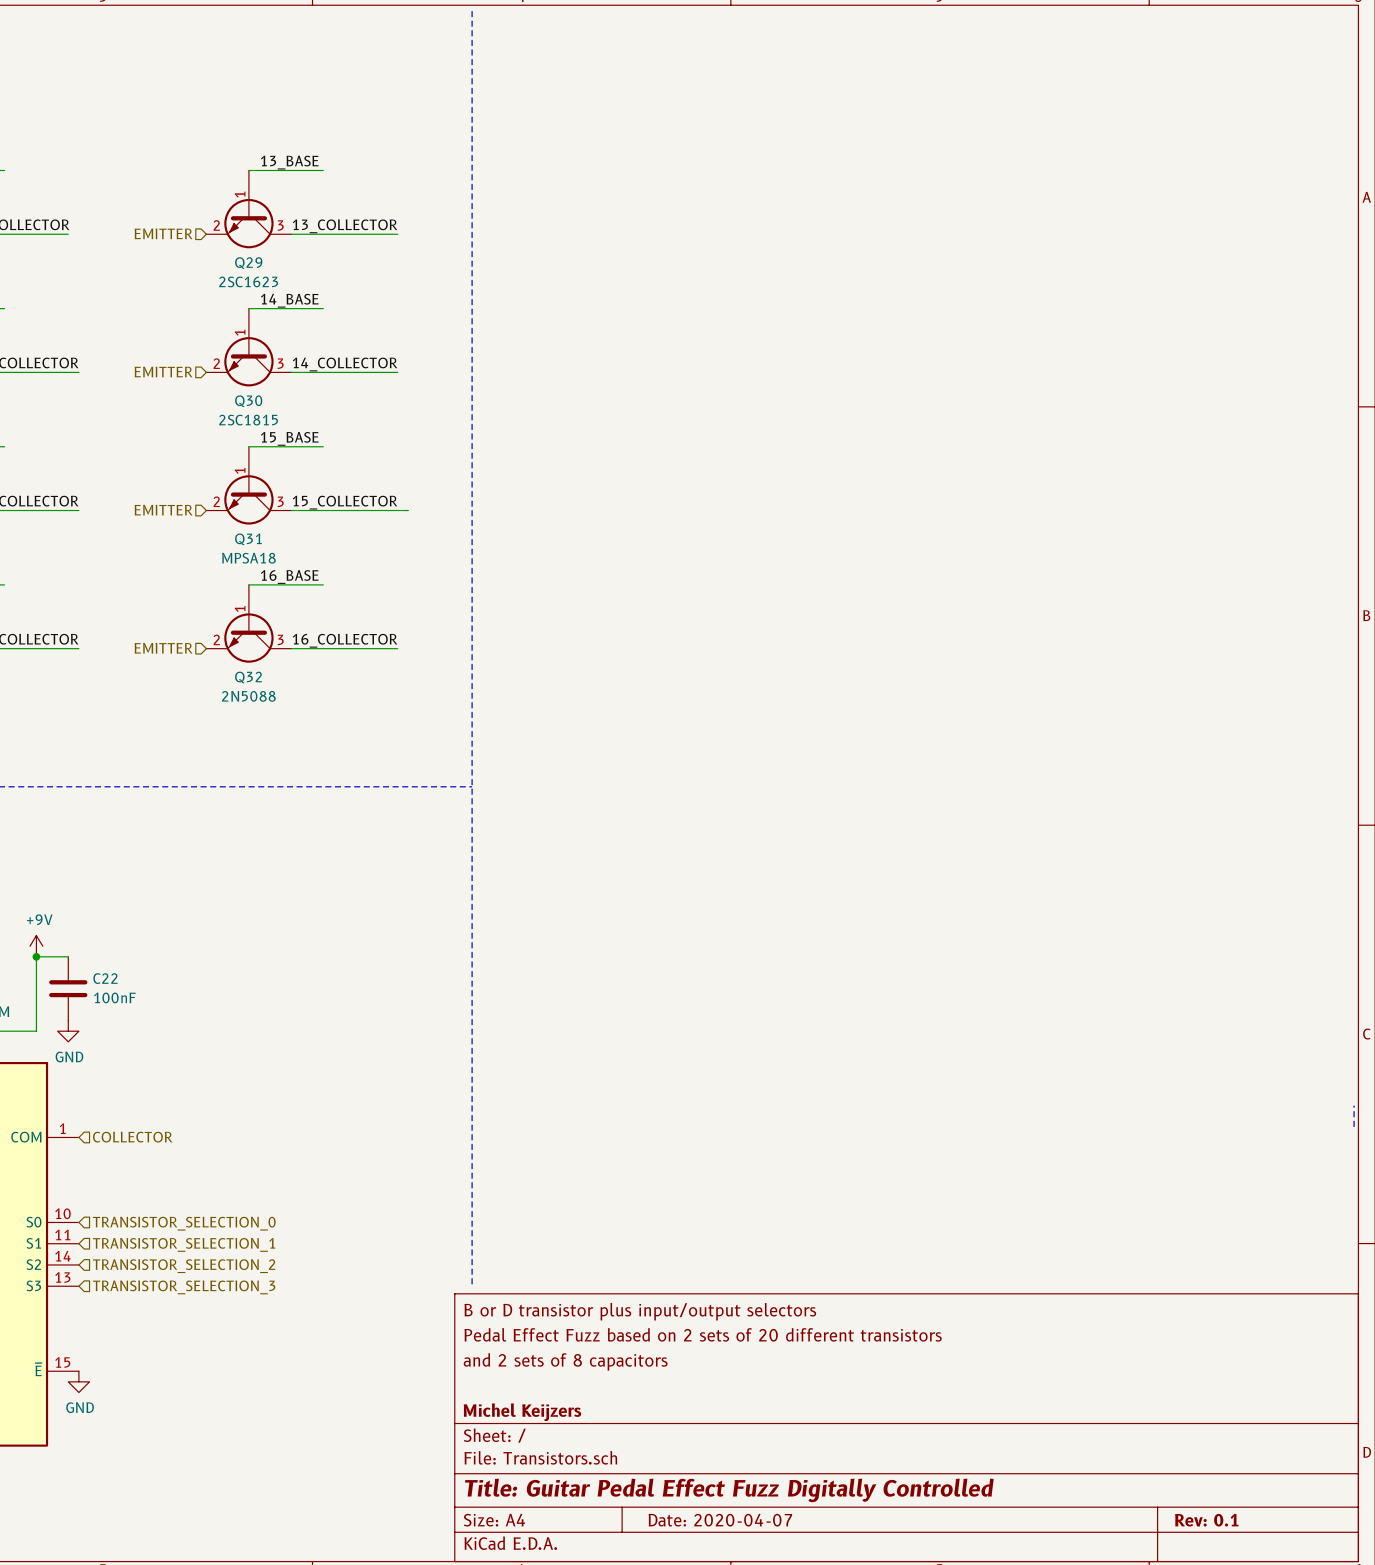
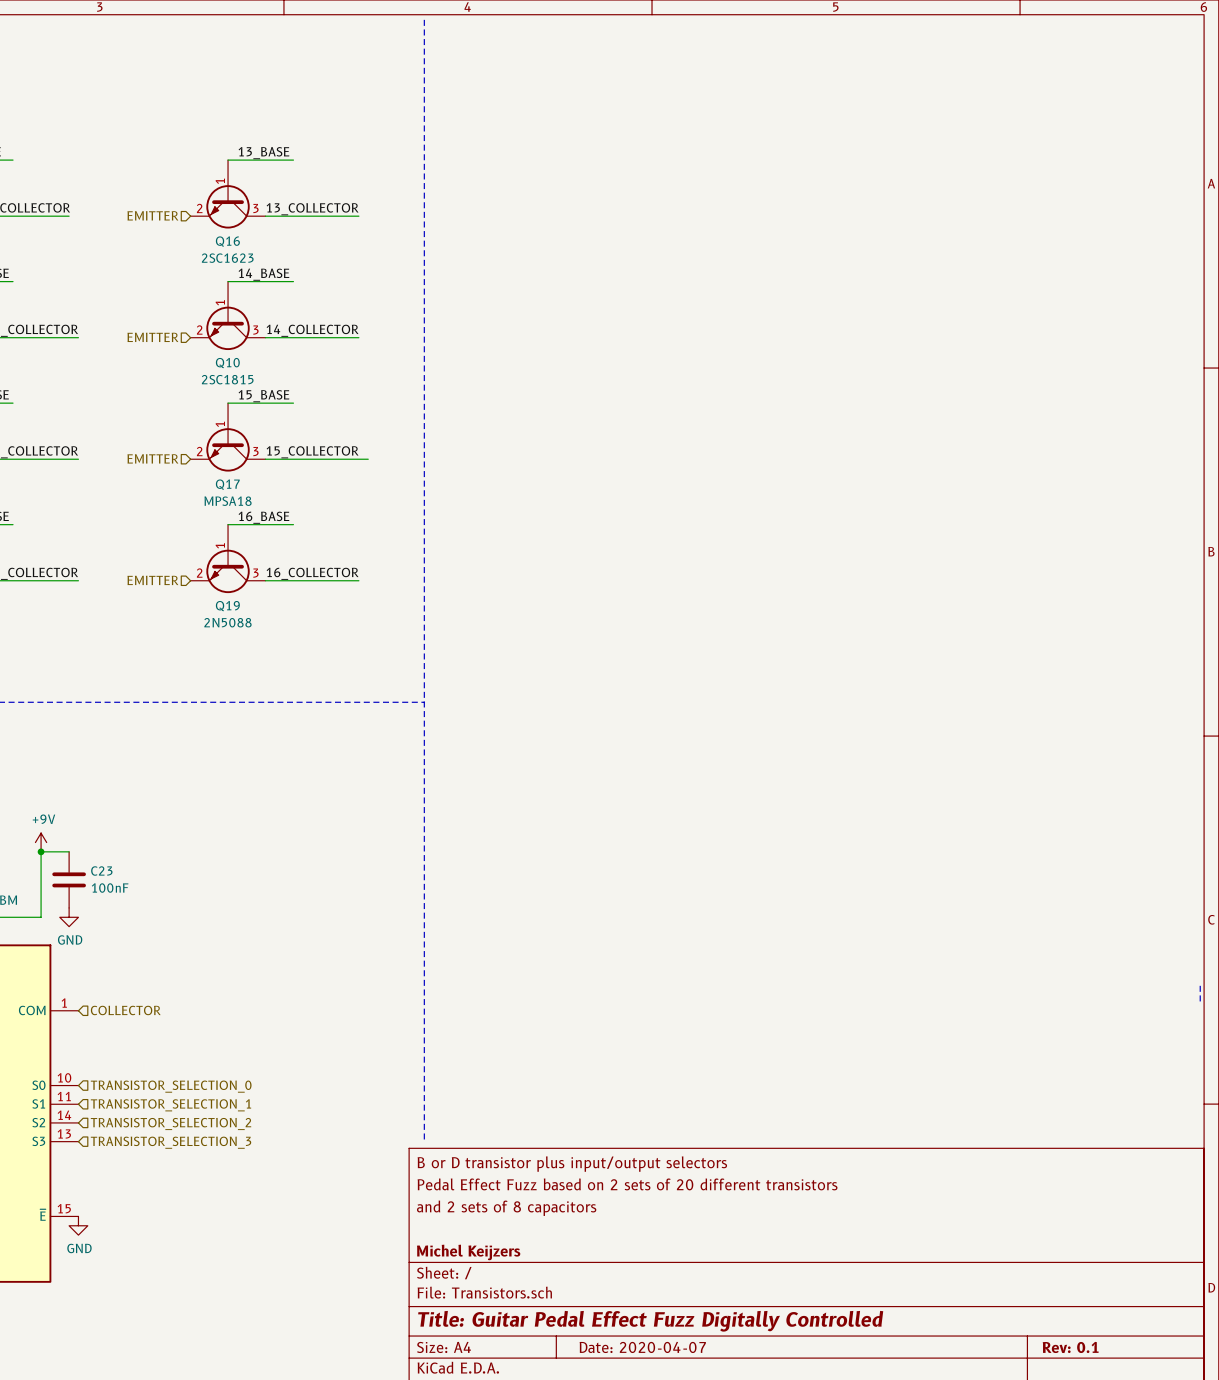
Q29 name: Q29 (248, 263) -> Q16 (227, 241)
Q30 name: Q30 (248, 401) -> Q10 (227, 363)
Q31 name: Q31 (248, 539) -> Q17 (227, 484)
Q32 name: Q32 (248, 677) -> Q19 (227, 606)
C22 name: C22 (105, 978) -> C23 (101, 871)

